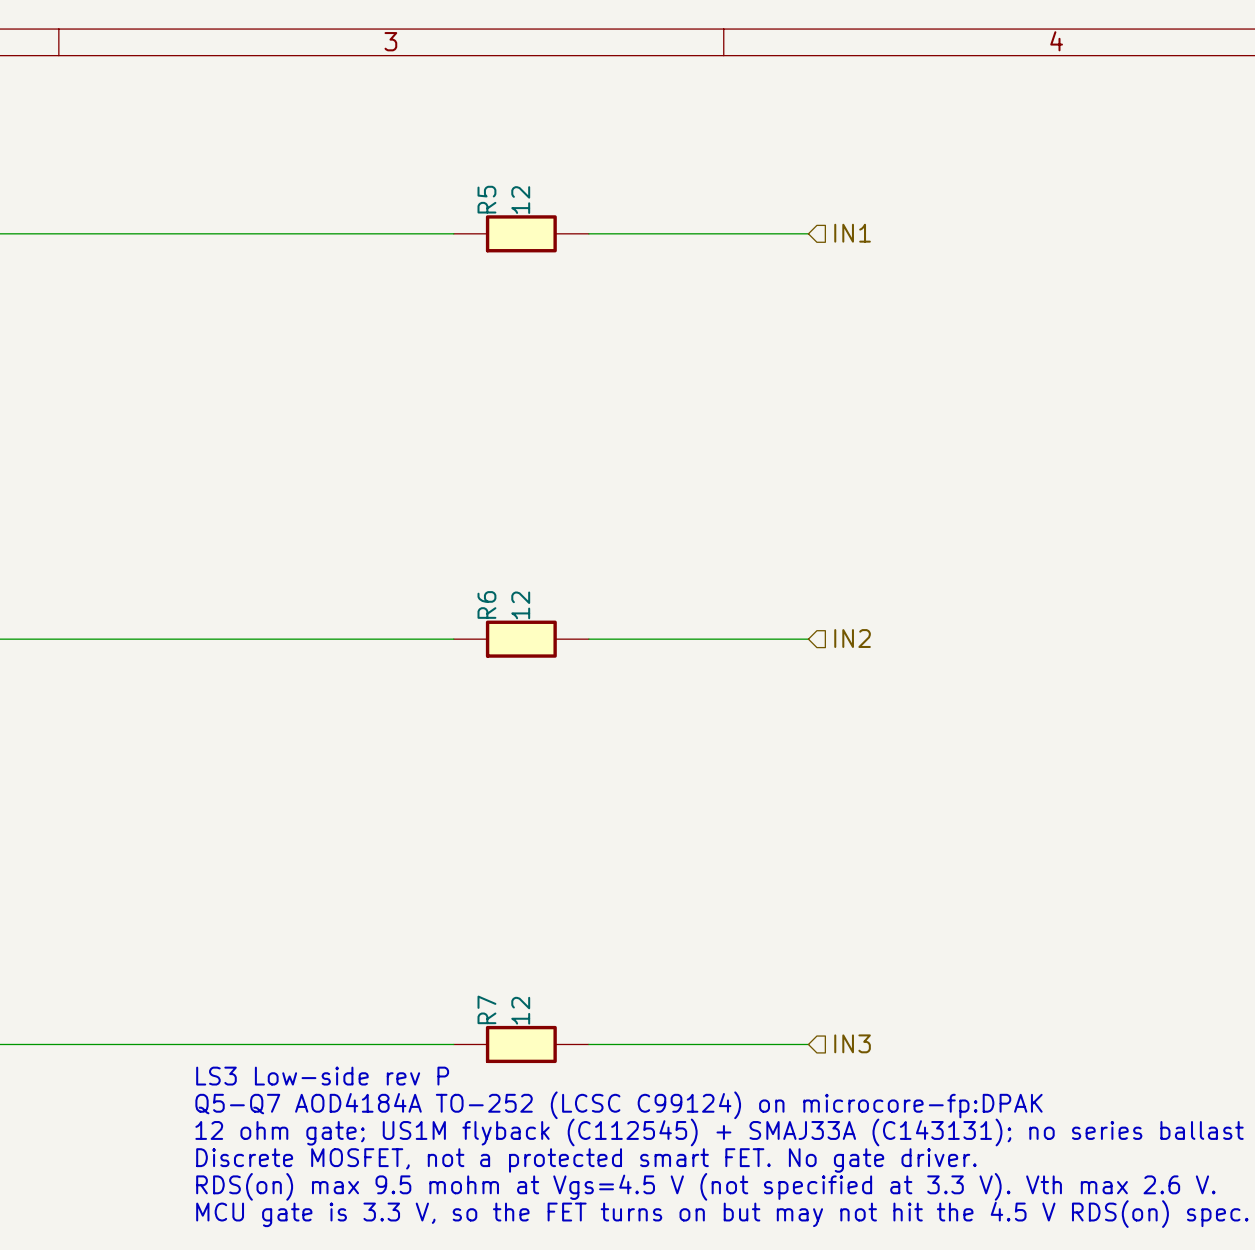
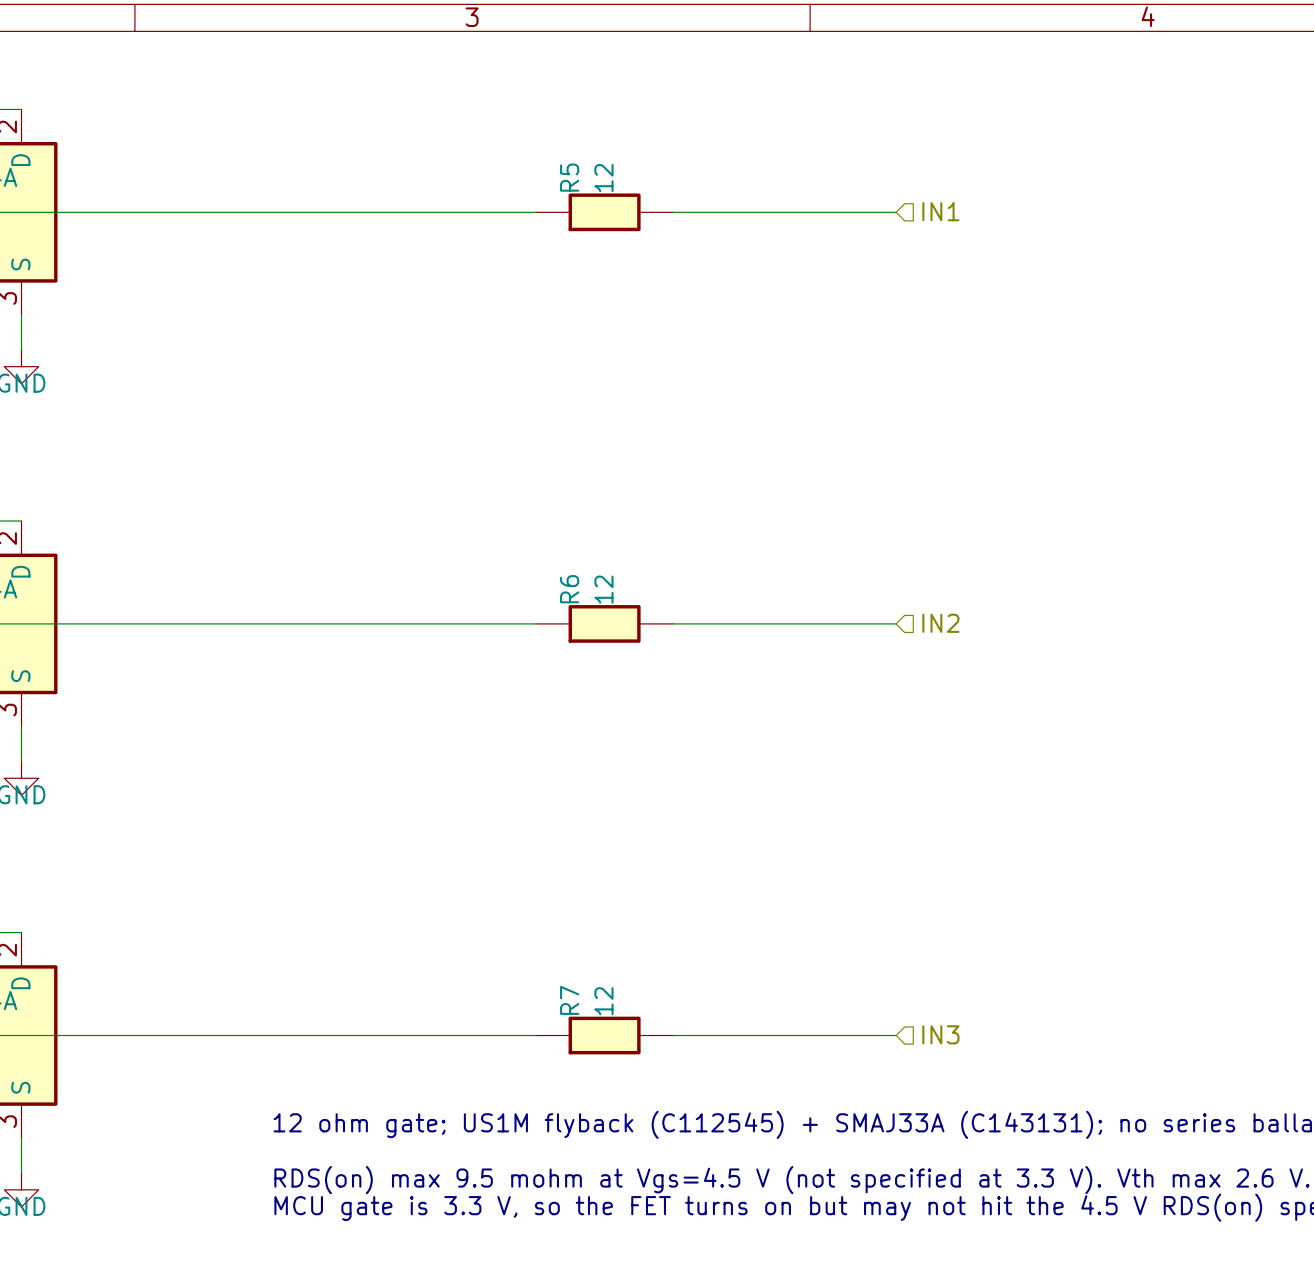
text: LS3 Low-side rev P (322, 1076) -> none
text: Q5-Q7 AOD4184A TO-252 (LCSC C99124) on microcore-fp:DPAK (618, 1105) -> none
text: Discrete MOSFET, not a protected smart FET. No gate driver. (586, 1160) -> none

